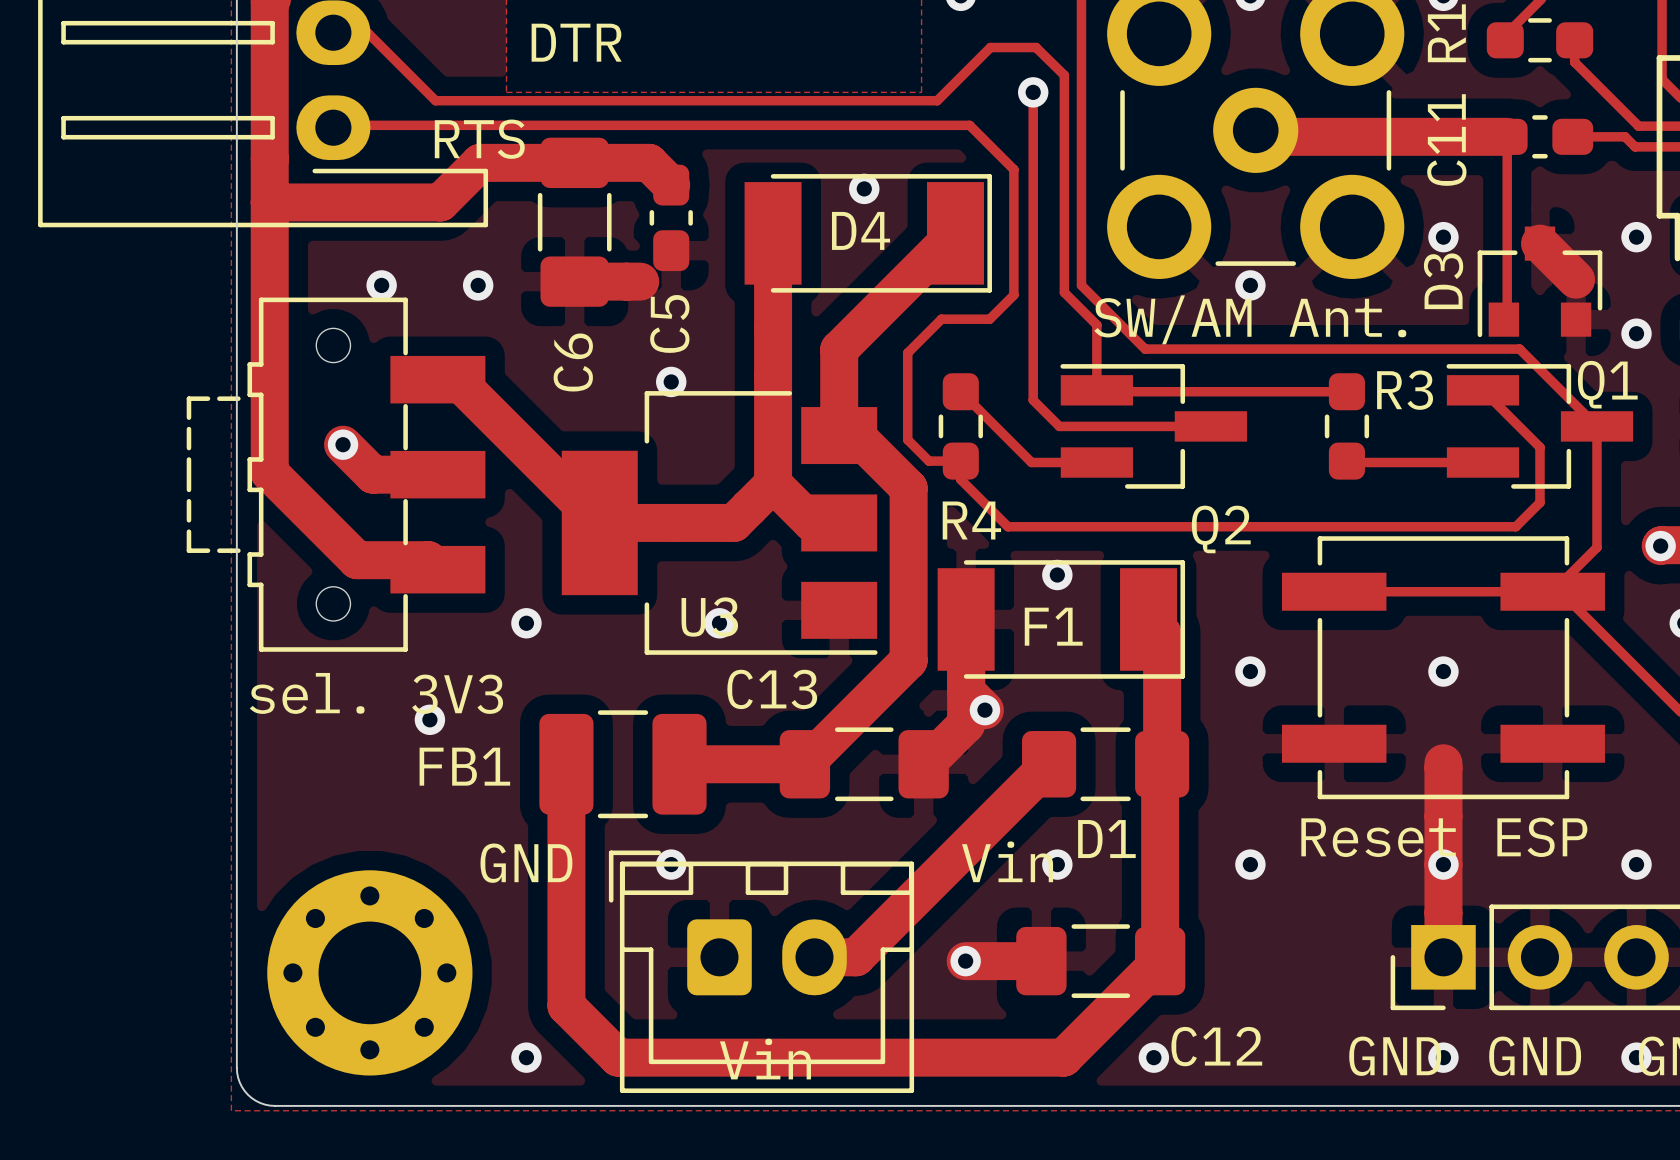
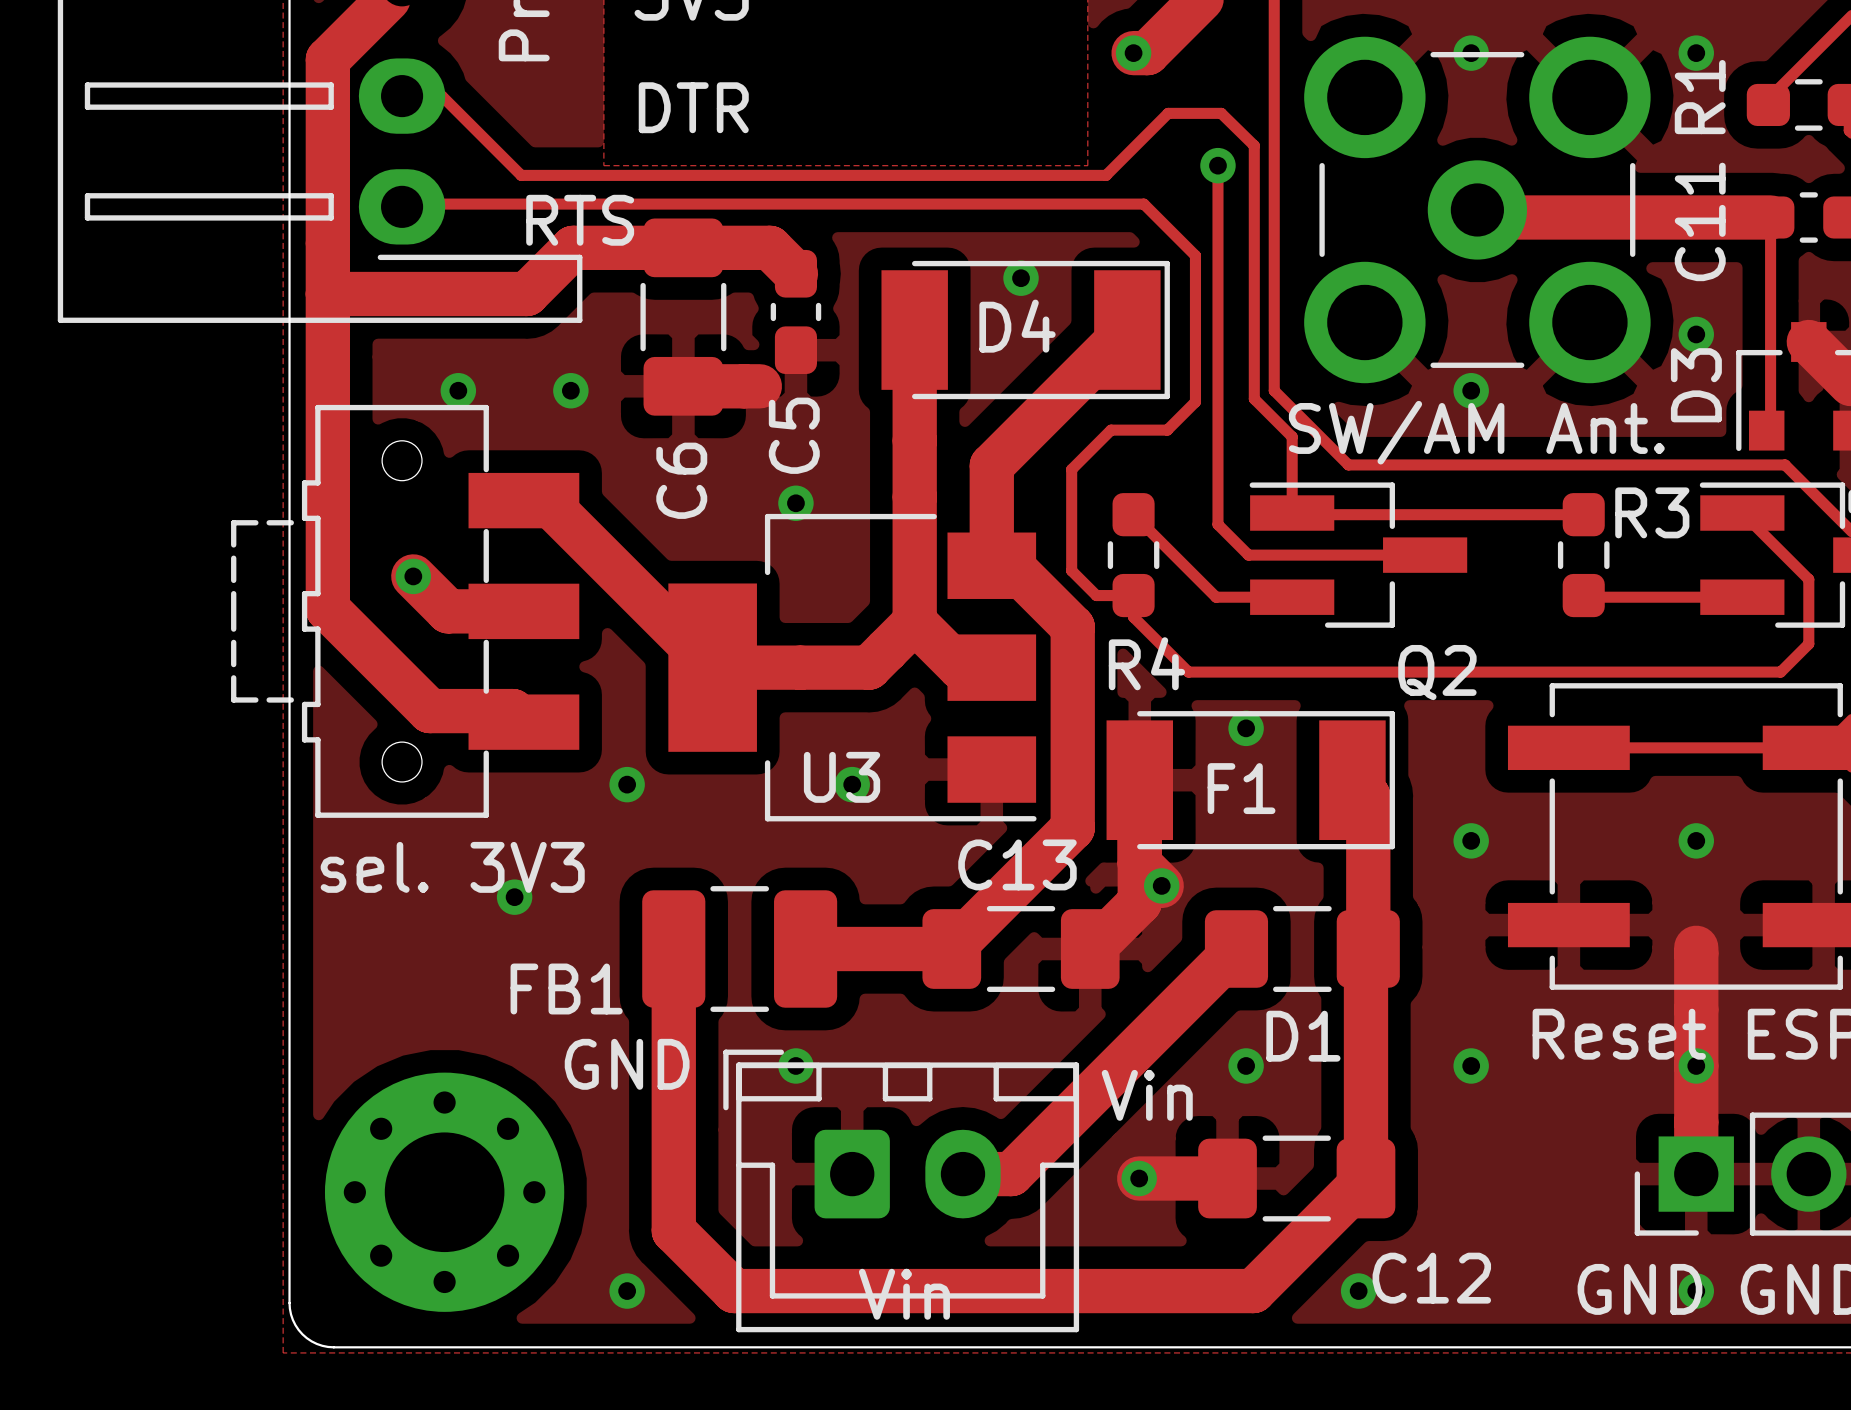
C13 name position: C13 (772, 689) -> C13 (1017, 864)
FB1 name position: FB1 (464, 766) -> FB1 (566, 988)
text position: Vin (1007, 861) -> Vin (1147, 1095)

